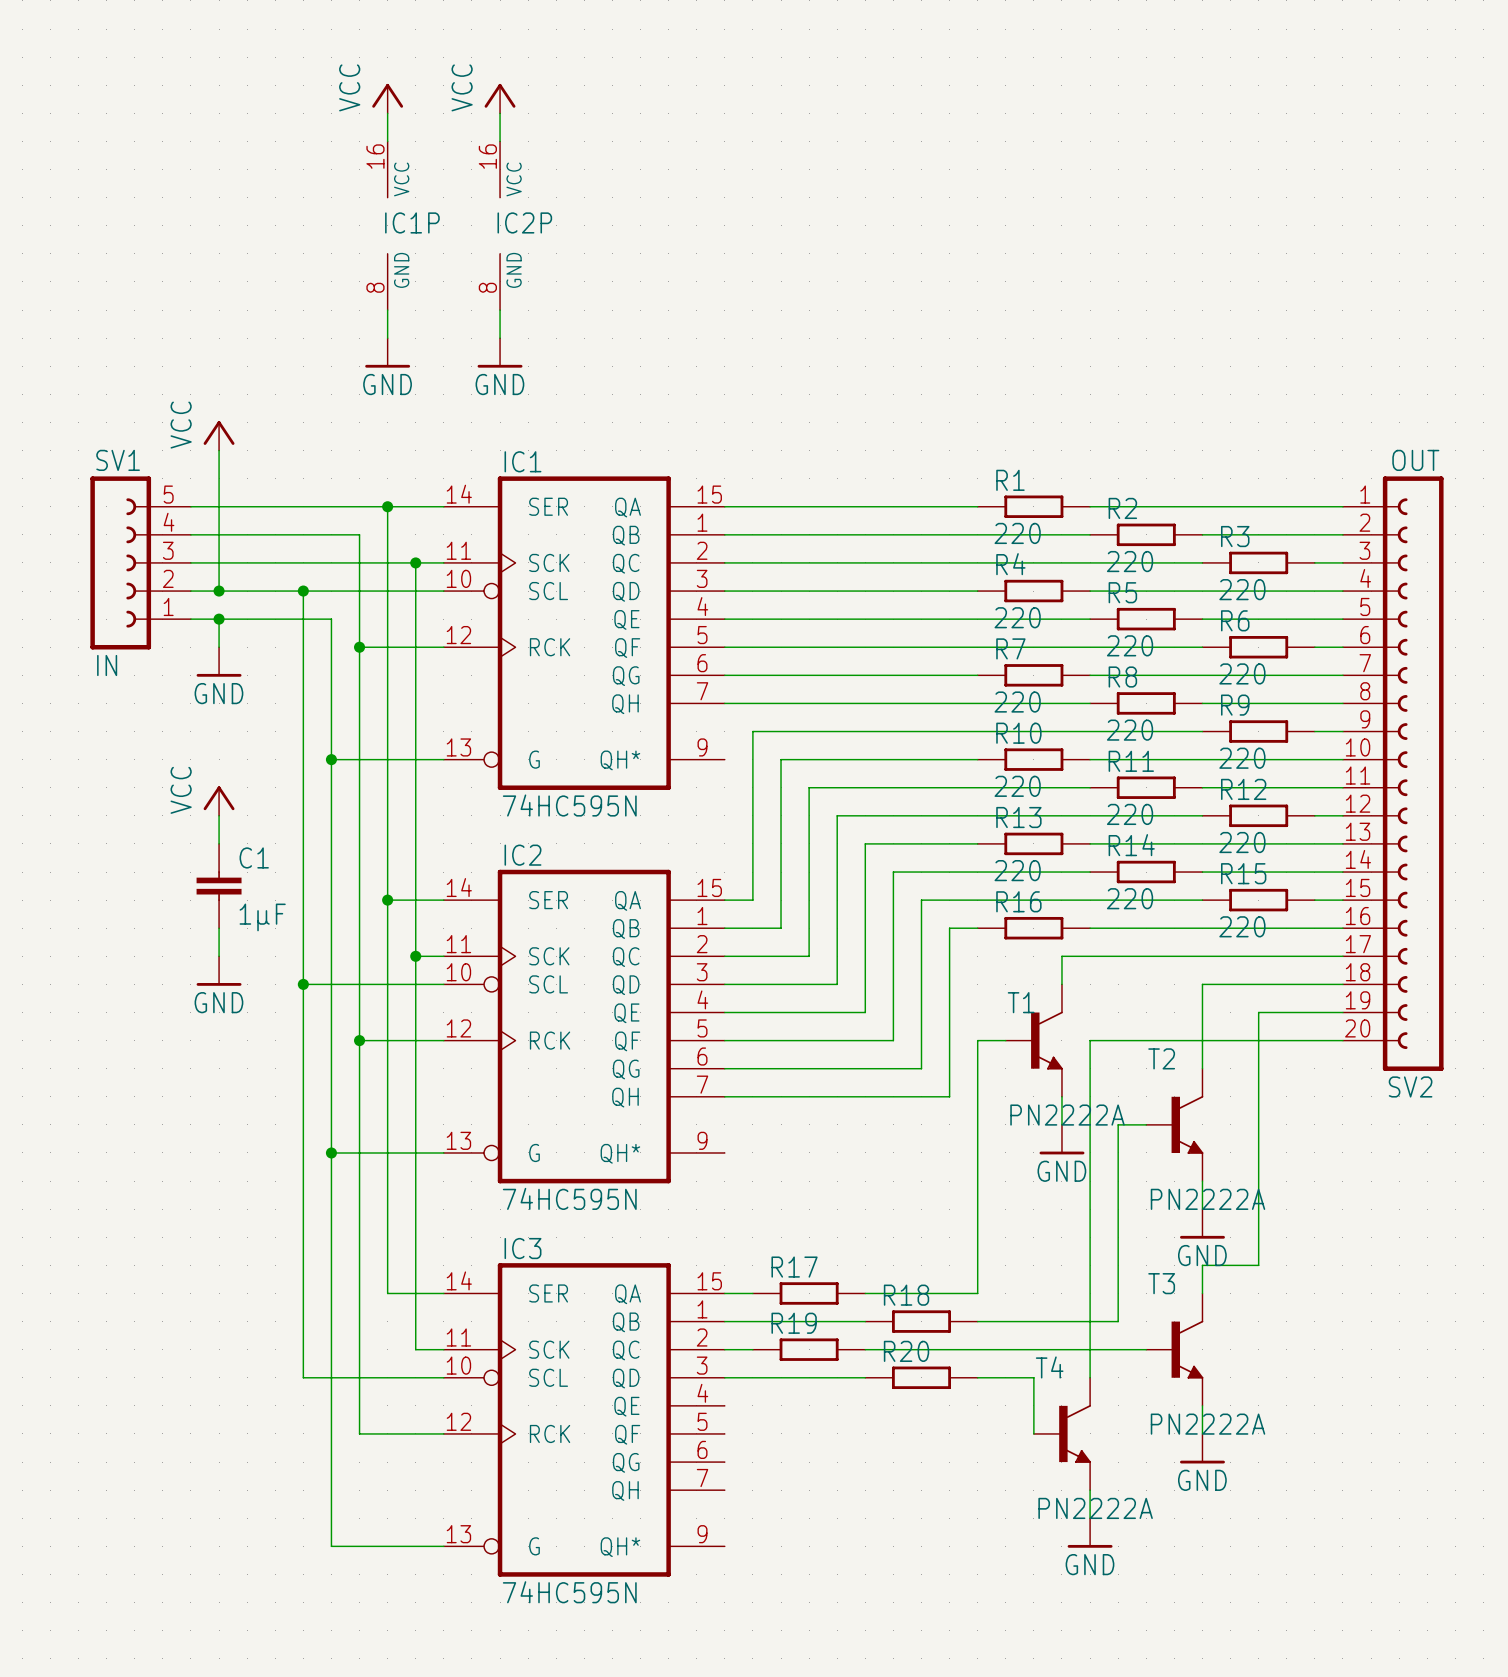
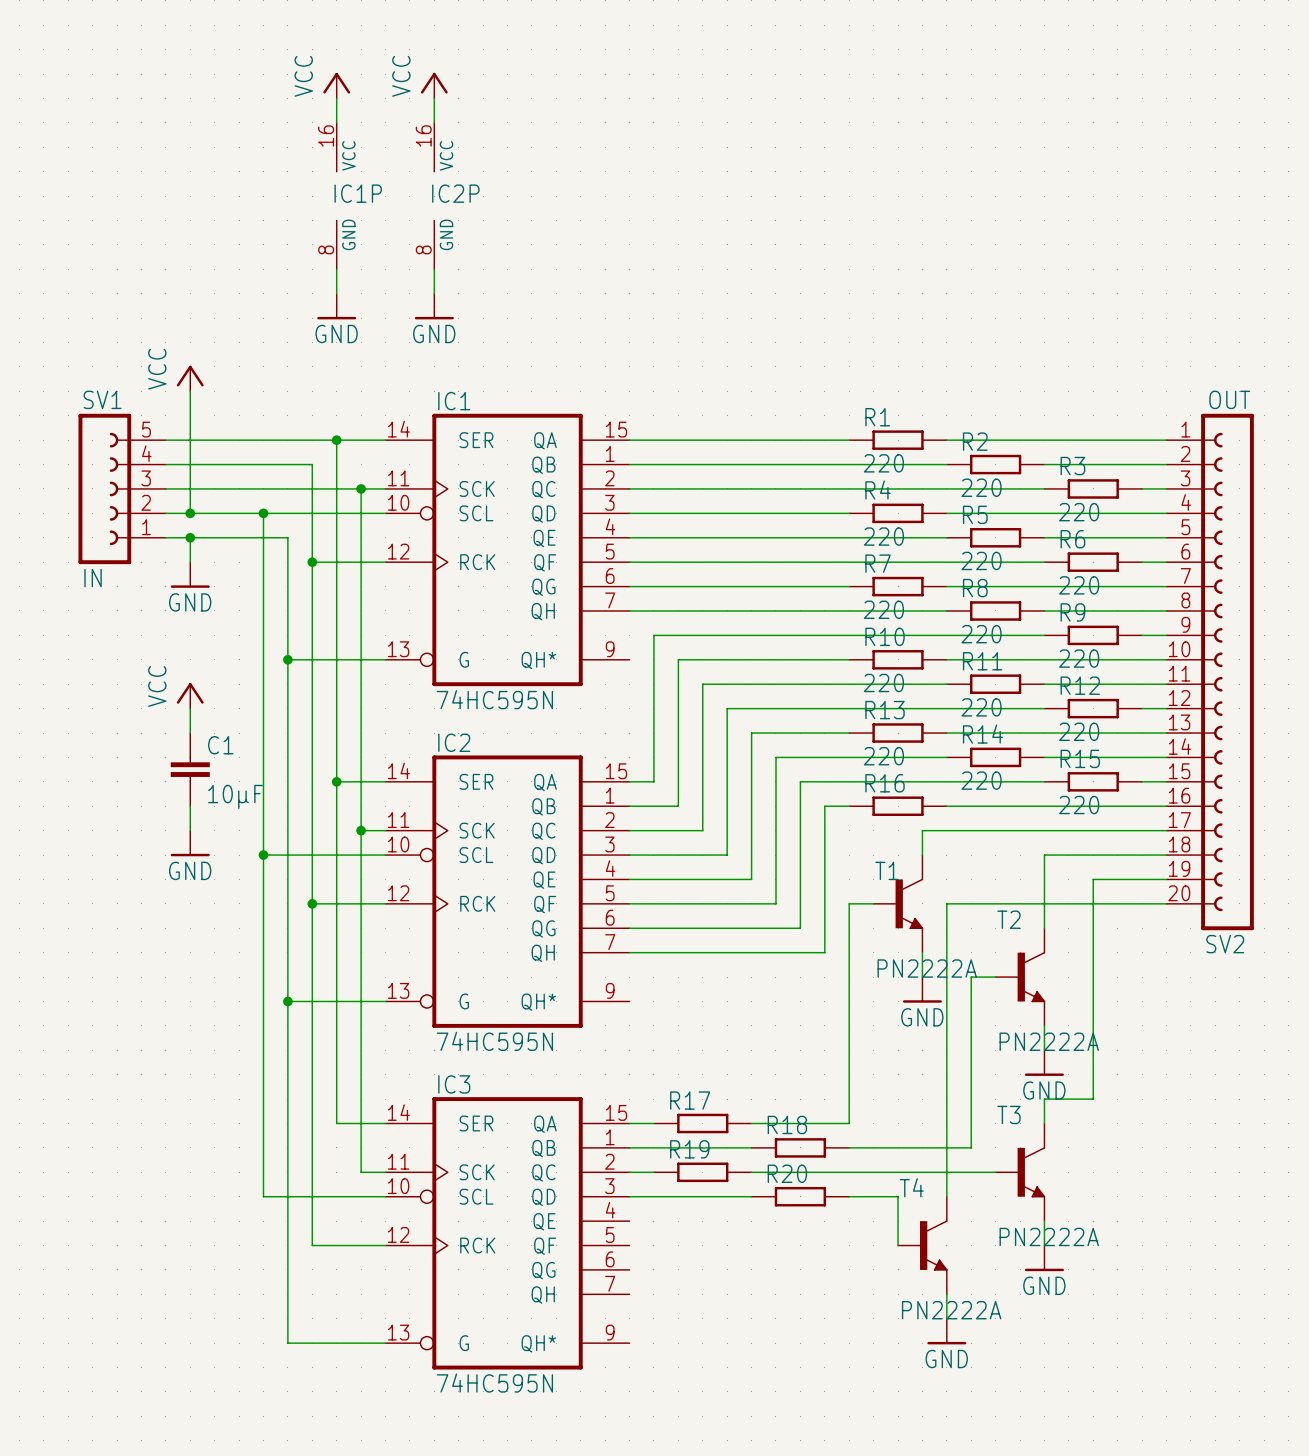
C1 value: 1µF (262, 917) -> 10µF (235, 796)

